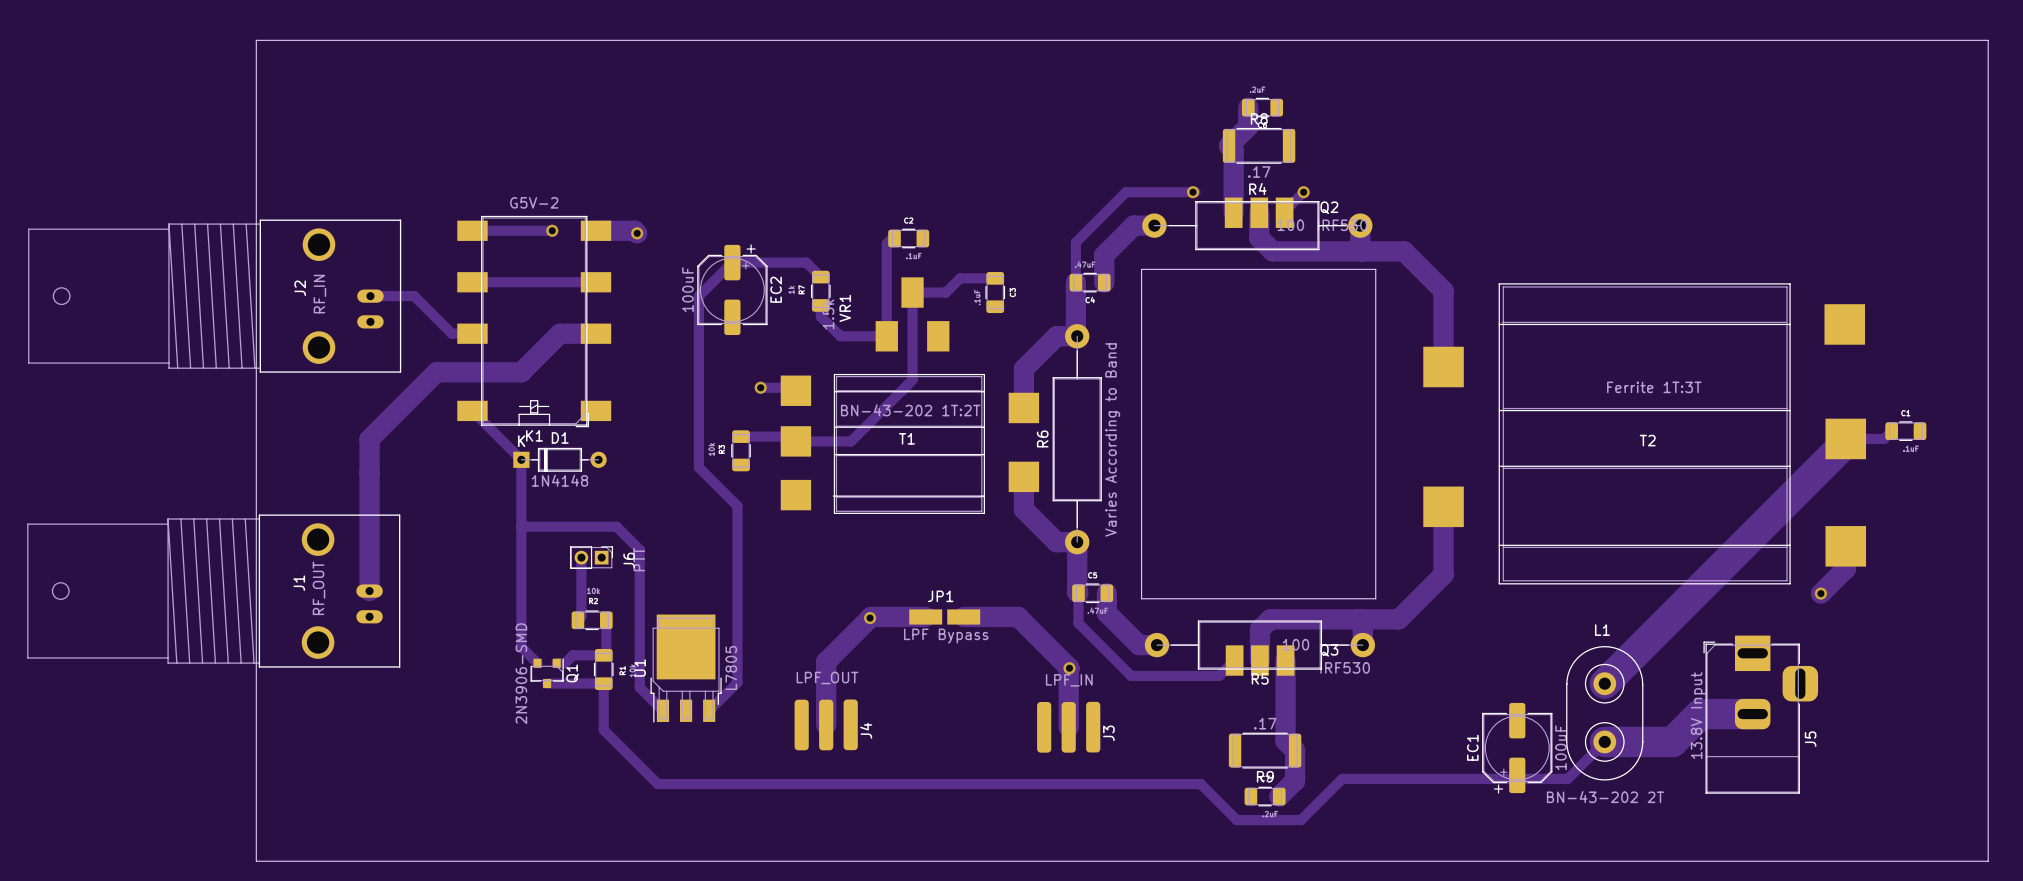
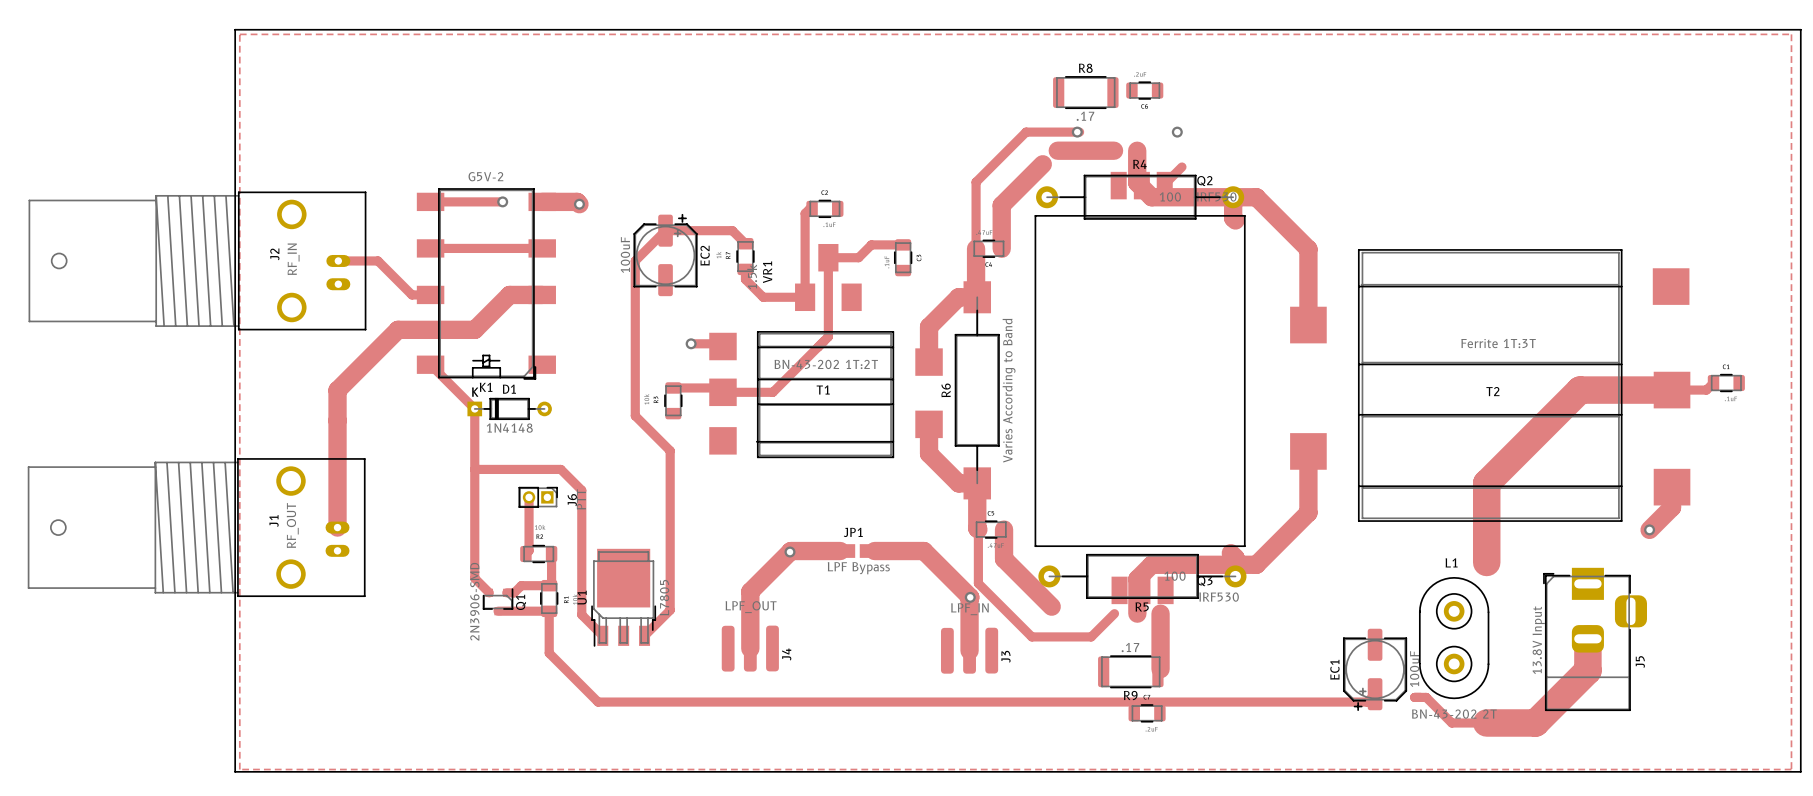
zone outline: none -> (239, 34) (239, 769) (1791, 769) (1791, 34) (239, 34)
track: (1248, 107) (1248, 126) (1229, 145) (1233, 150) (1233, 212) -> none
R8 position: (1259, 145) -> (1085, 92)
track: none -> (1057, 150) (1114, 150)
via position: (1193, 192) -> (1077, 132)
track: (1195, 192) (1126, 192) (1075, 242) -> (1079, 132) (1026, 132) (976, 182) (976, 212)
via position: (1303, 192) -> (1177, 132)
track: (1259, 212) (1259, 237) (1272, 251) (1404, 251) (1443, 290) -> (1137, 150) (1137, 182) (1151, 197) (1256, 197) (1308, 249) (1308, 256)
track: (1154, 225) (1133, 225) (1104, 255) -> (1042, 164) (1001, 205) (1001, 223)
board edge: (1141, 269) (1375, 269) (1375, 598) (1141, 598) -> (1035, 236) (1035, 215) (1244, 215) (1244, 546) (1035, 546) (1035, 534)
R6 footprint: [1052, 324, 1102, 555] -> [955, 281, 1000, 500]
track: none -> (1672, 390) (1580, 390) (1486, 483) (1486, 562)
track: (1845, 442) (1604, 683) -> none
track: (1106, 612) (1138, 645) (1156, 645) -> (1004, 547) (1004, 559) (1051, 606)
track: (1398, 619) (1270, 619) (1259, 629) (1259, 660) -> (1268, 553) (1256, 564) (1151, 564) (1137, 579) (1137, 613)
track: (1078, 623) (1131, 675) (1219, 675) (1234, 660) -> (978, 556) (978, 583) (1031, 636) (1091, 636) (1114, 613)
track: (1285, 660) (1285, 741) (1295, 750) (1295, 780) (1279, 796) -> none
track: none -> (1160, 613) (1160, 669)
track: (1752, 714) (1700, 714) (1672, 741) (1604, 741) (1567, 778) -> (1587, 638) (1587, 670) (1535, 722) (1451, 722) (1426, 697) (1420, 697)
R9 position: (1265, 750) -> (1130, 671)
track: (1561, 778) (1342, 778) (1301, 820) (1236, 820) (1200, 784) -> (1375, 694) (1367, 702) (1088, 702)

